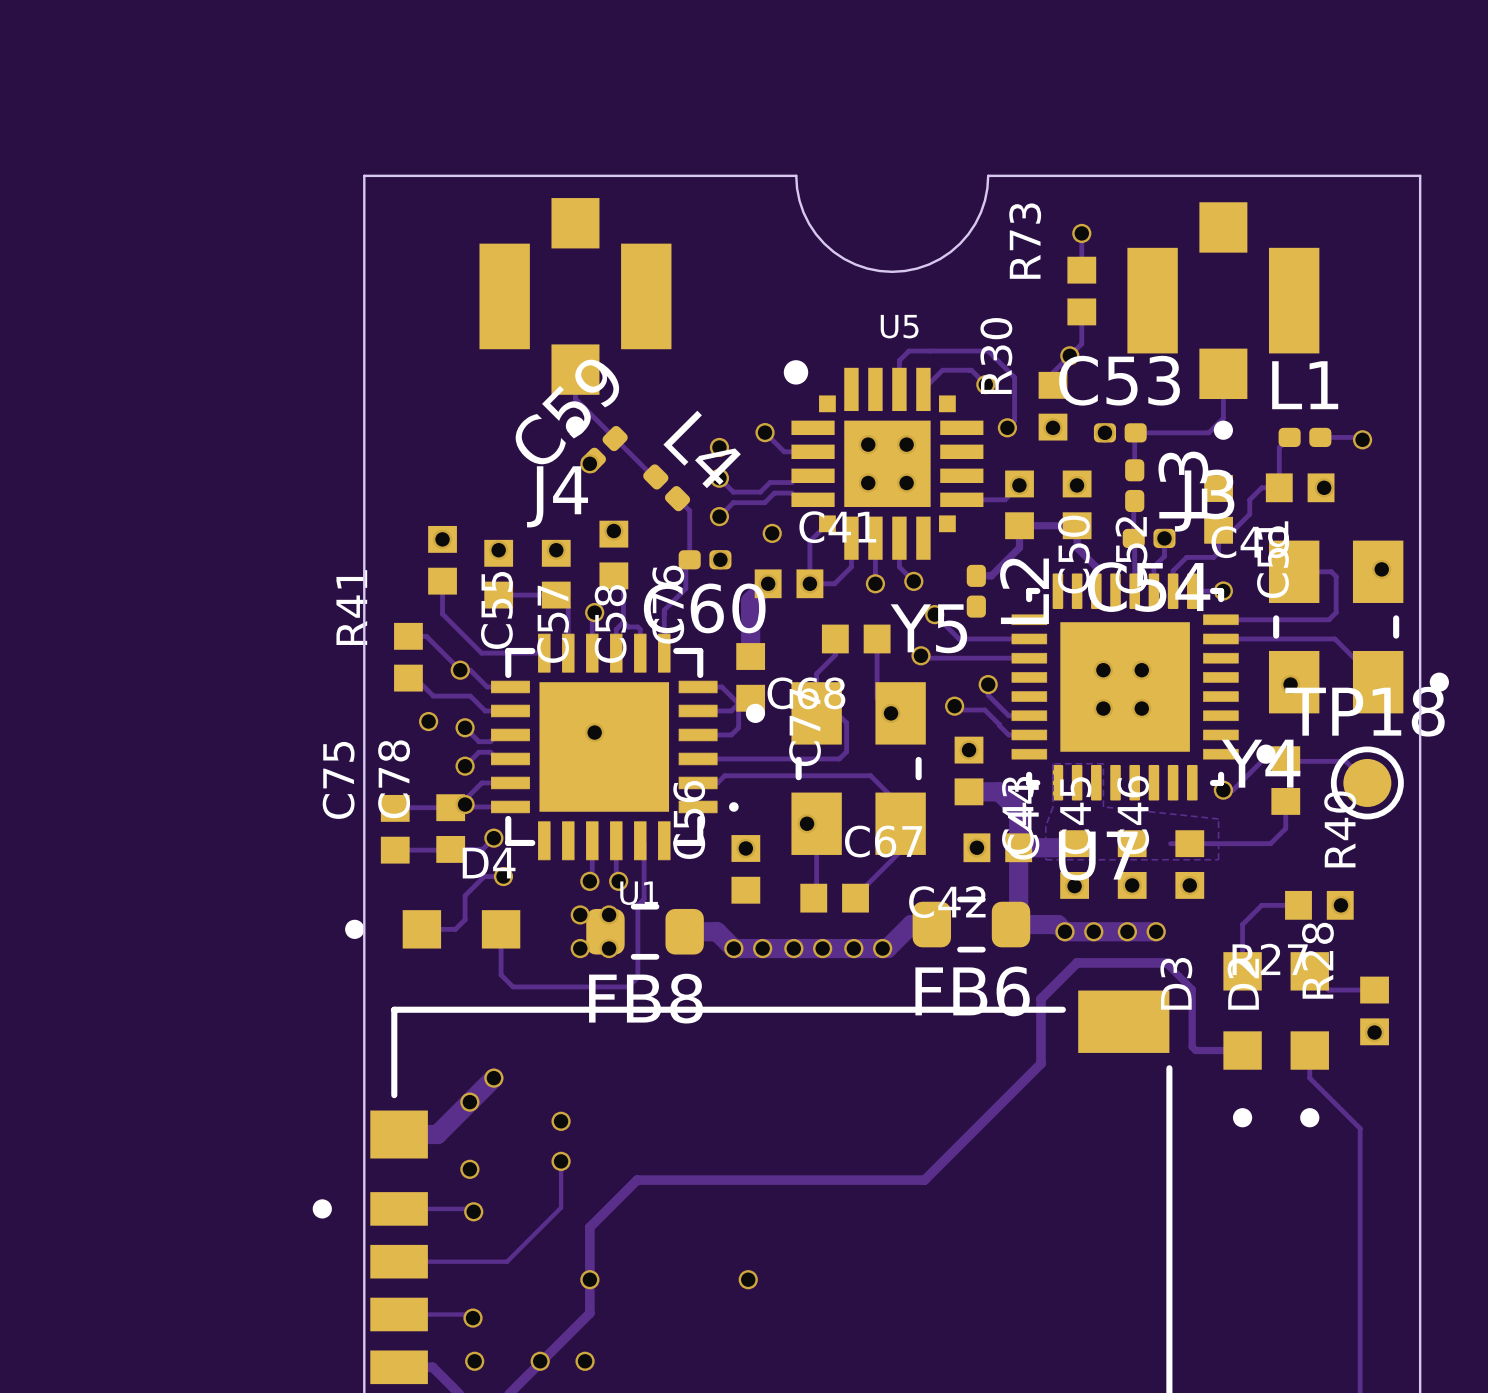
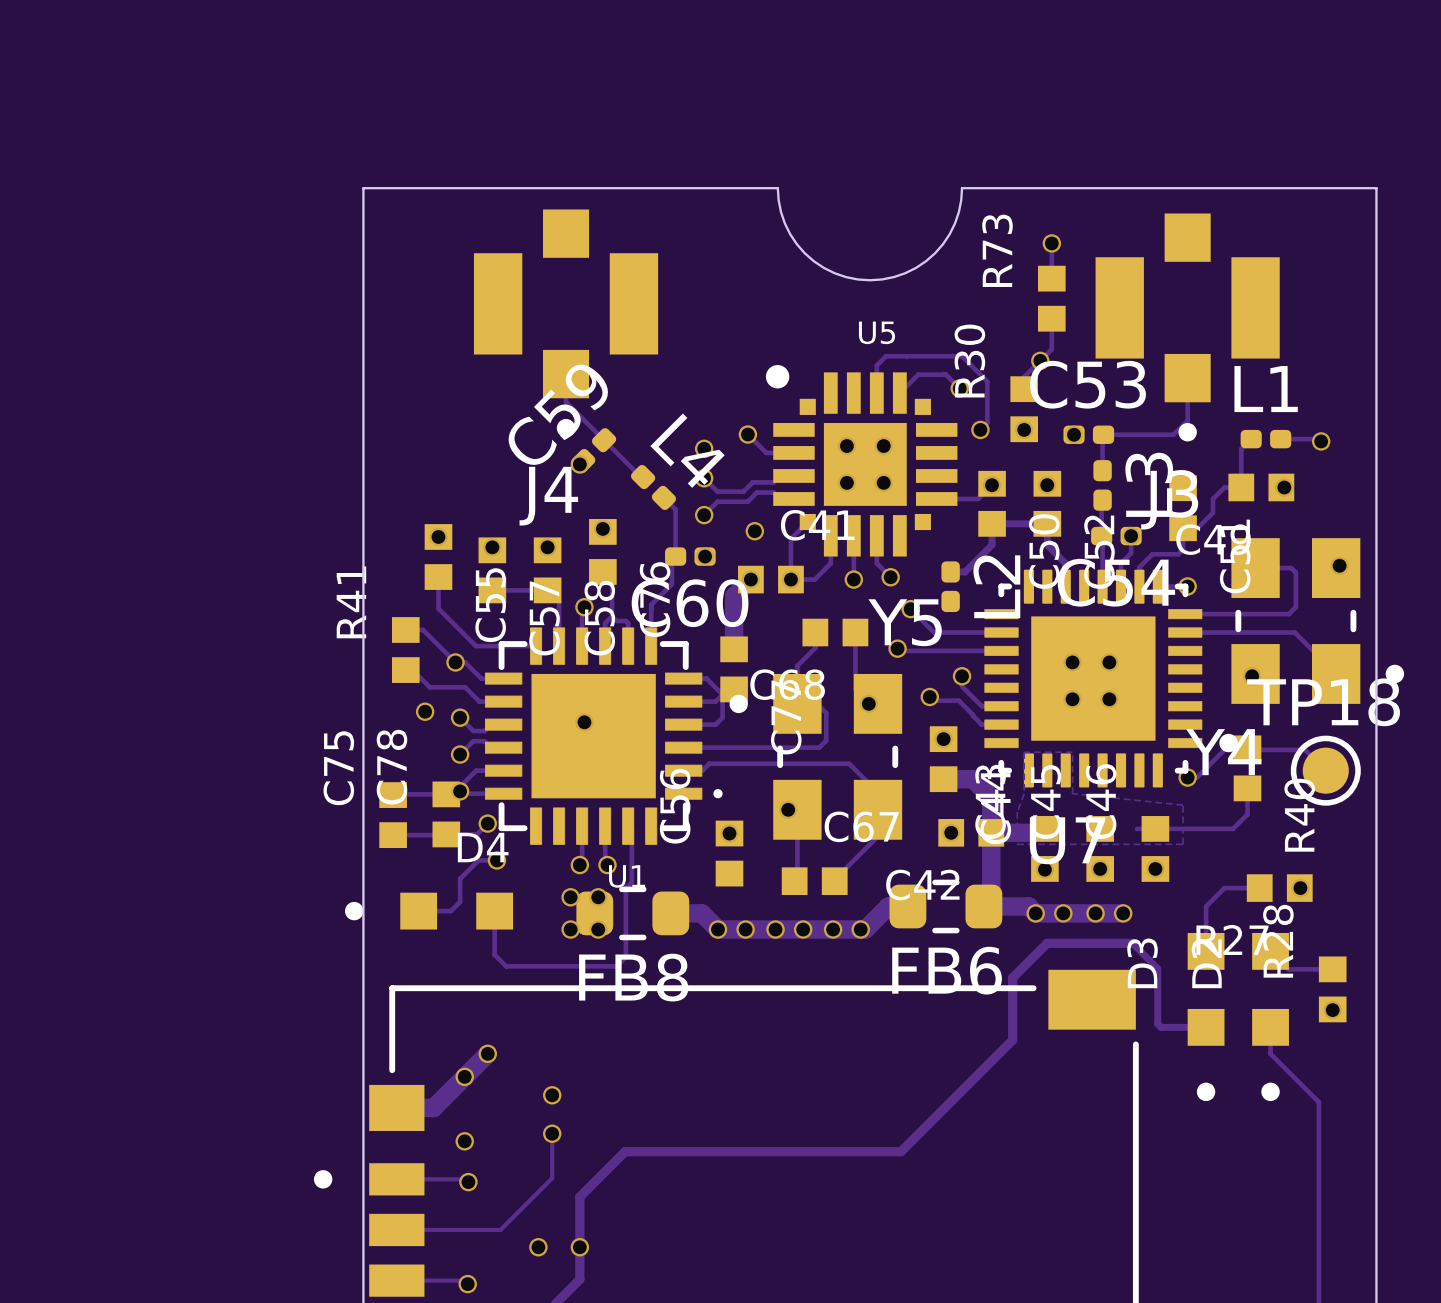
via: none -> (538, 1247)
via: (748, 1279) -> none

